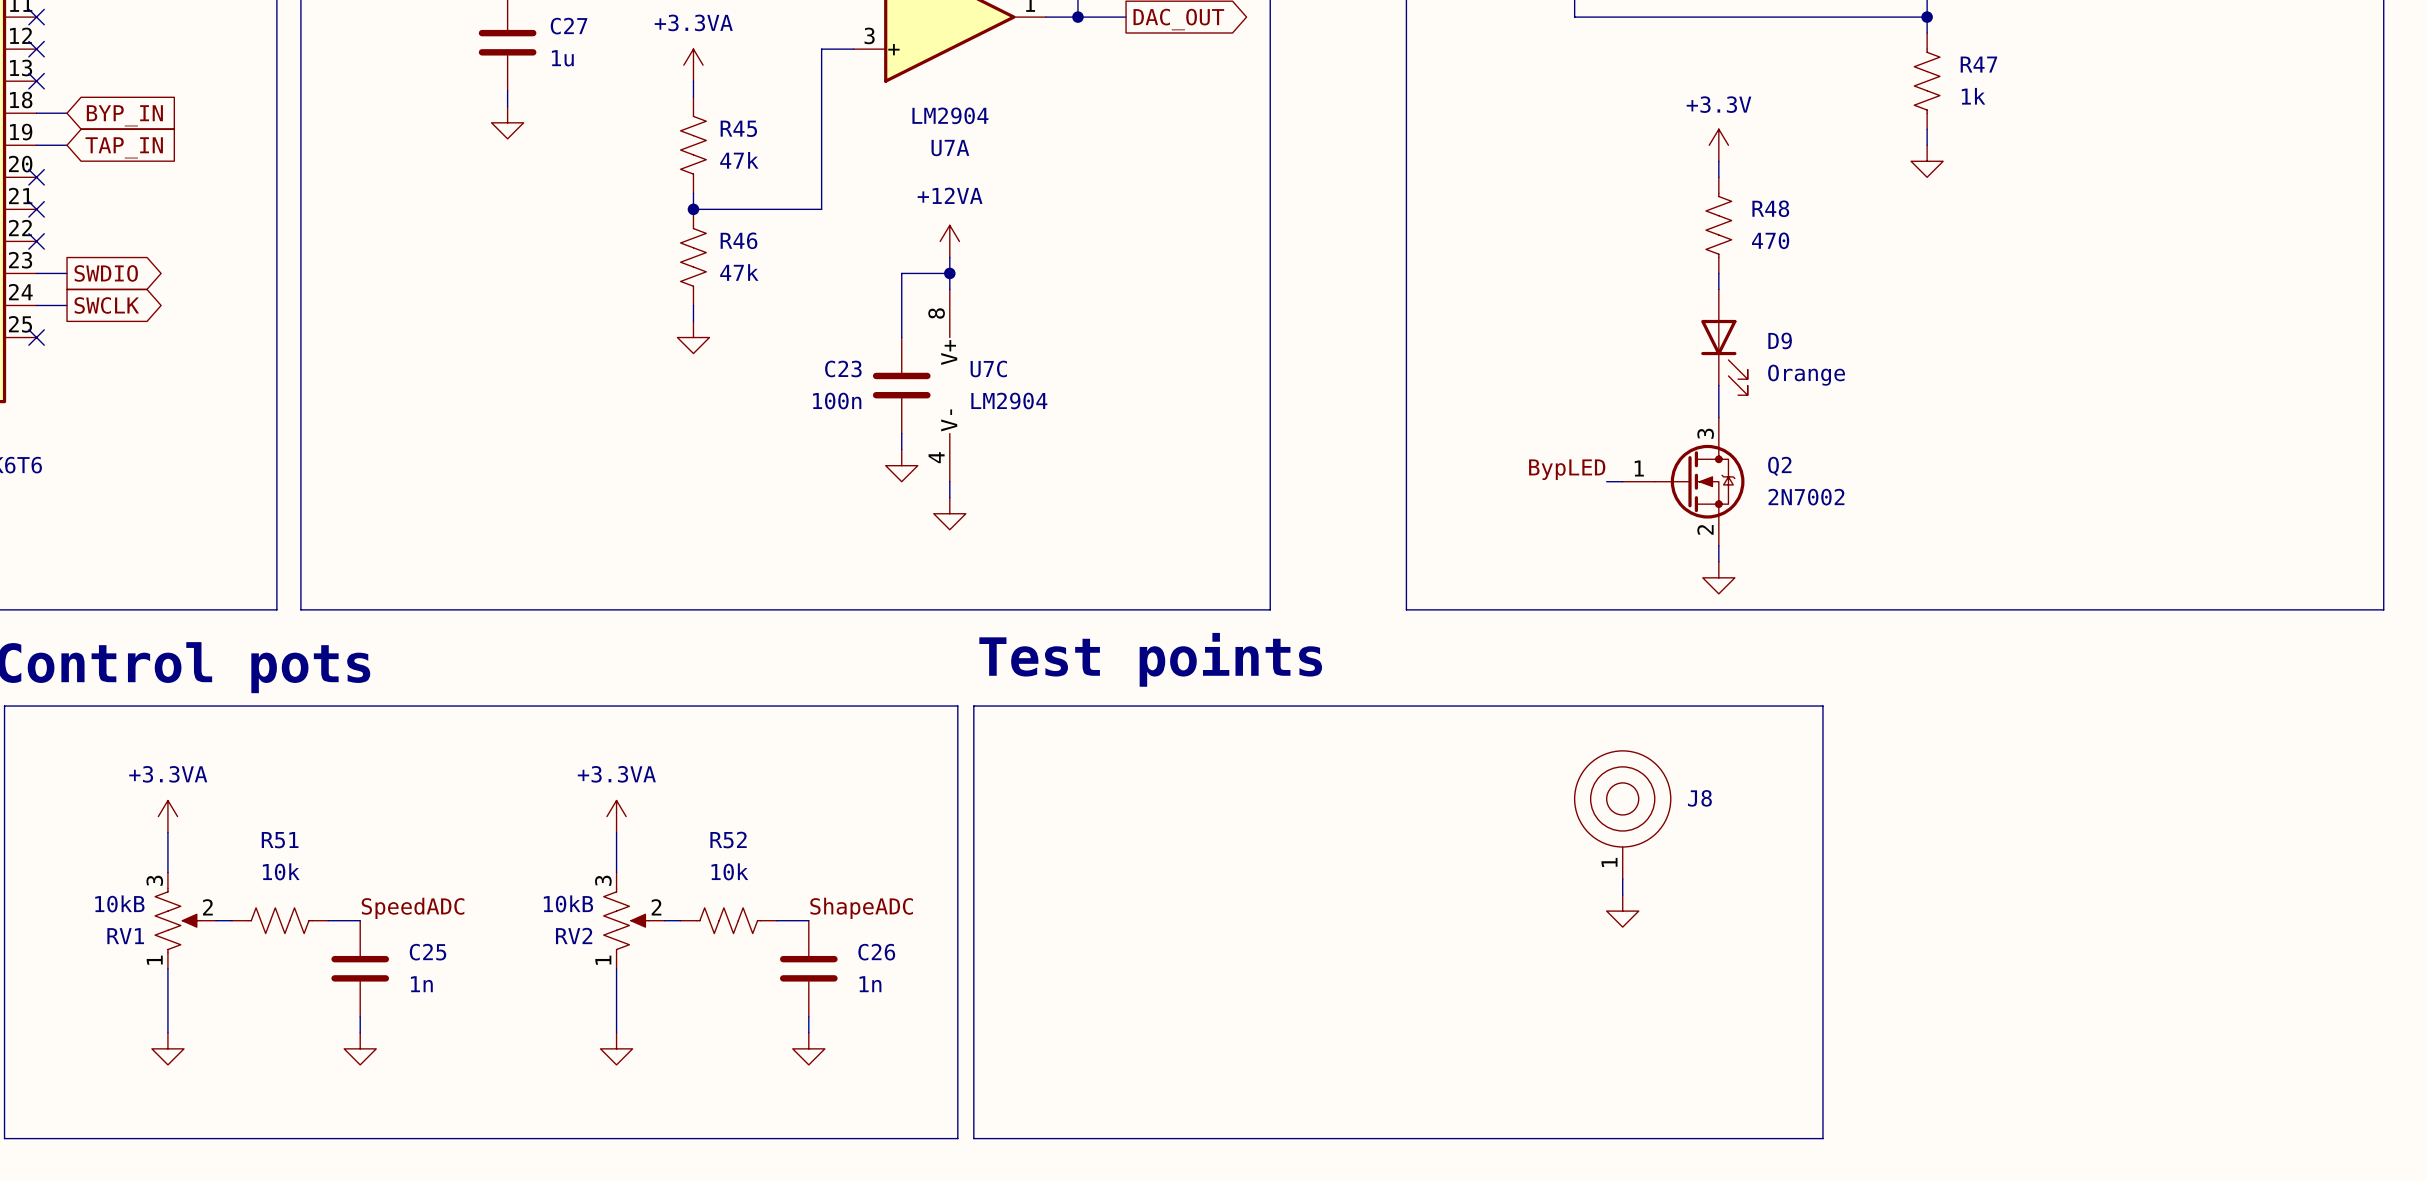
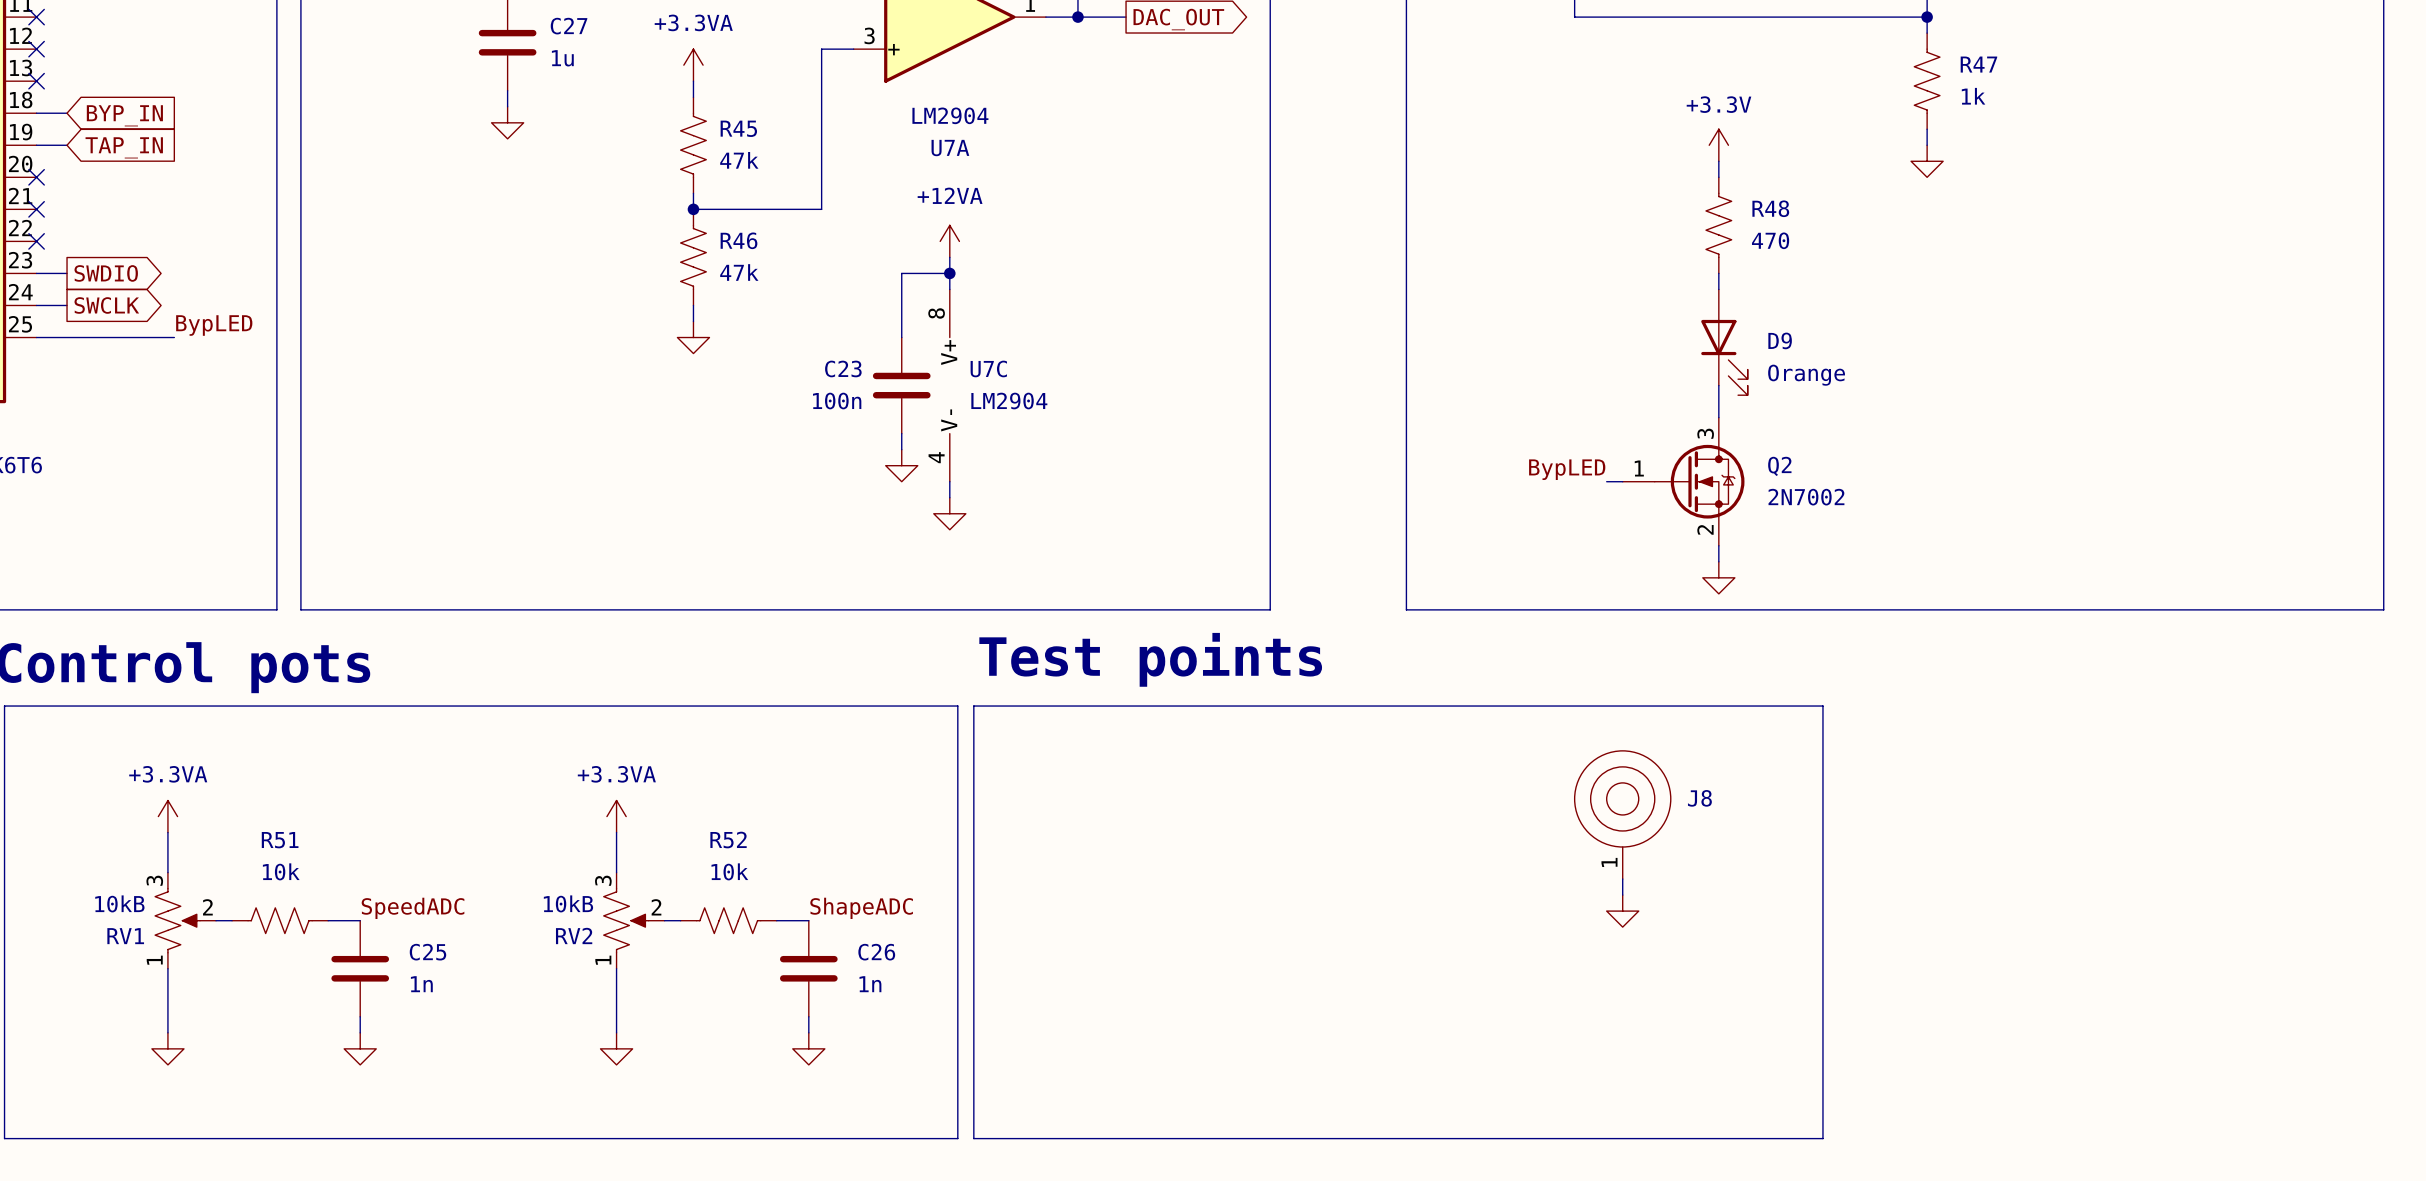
label: none -> BypLED (214, 325)
wire: none -> (36, 337) (174, 337)
no-connect mark: (36, 337) -> none

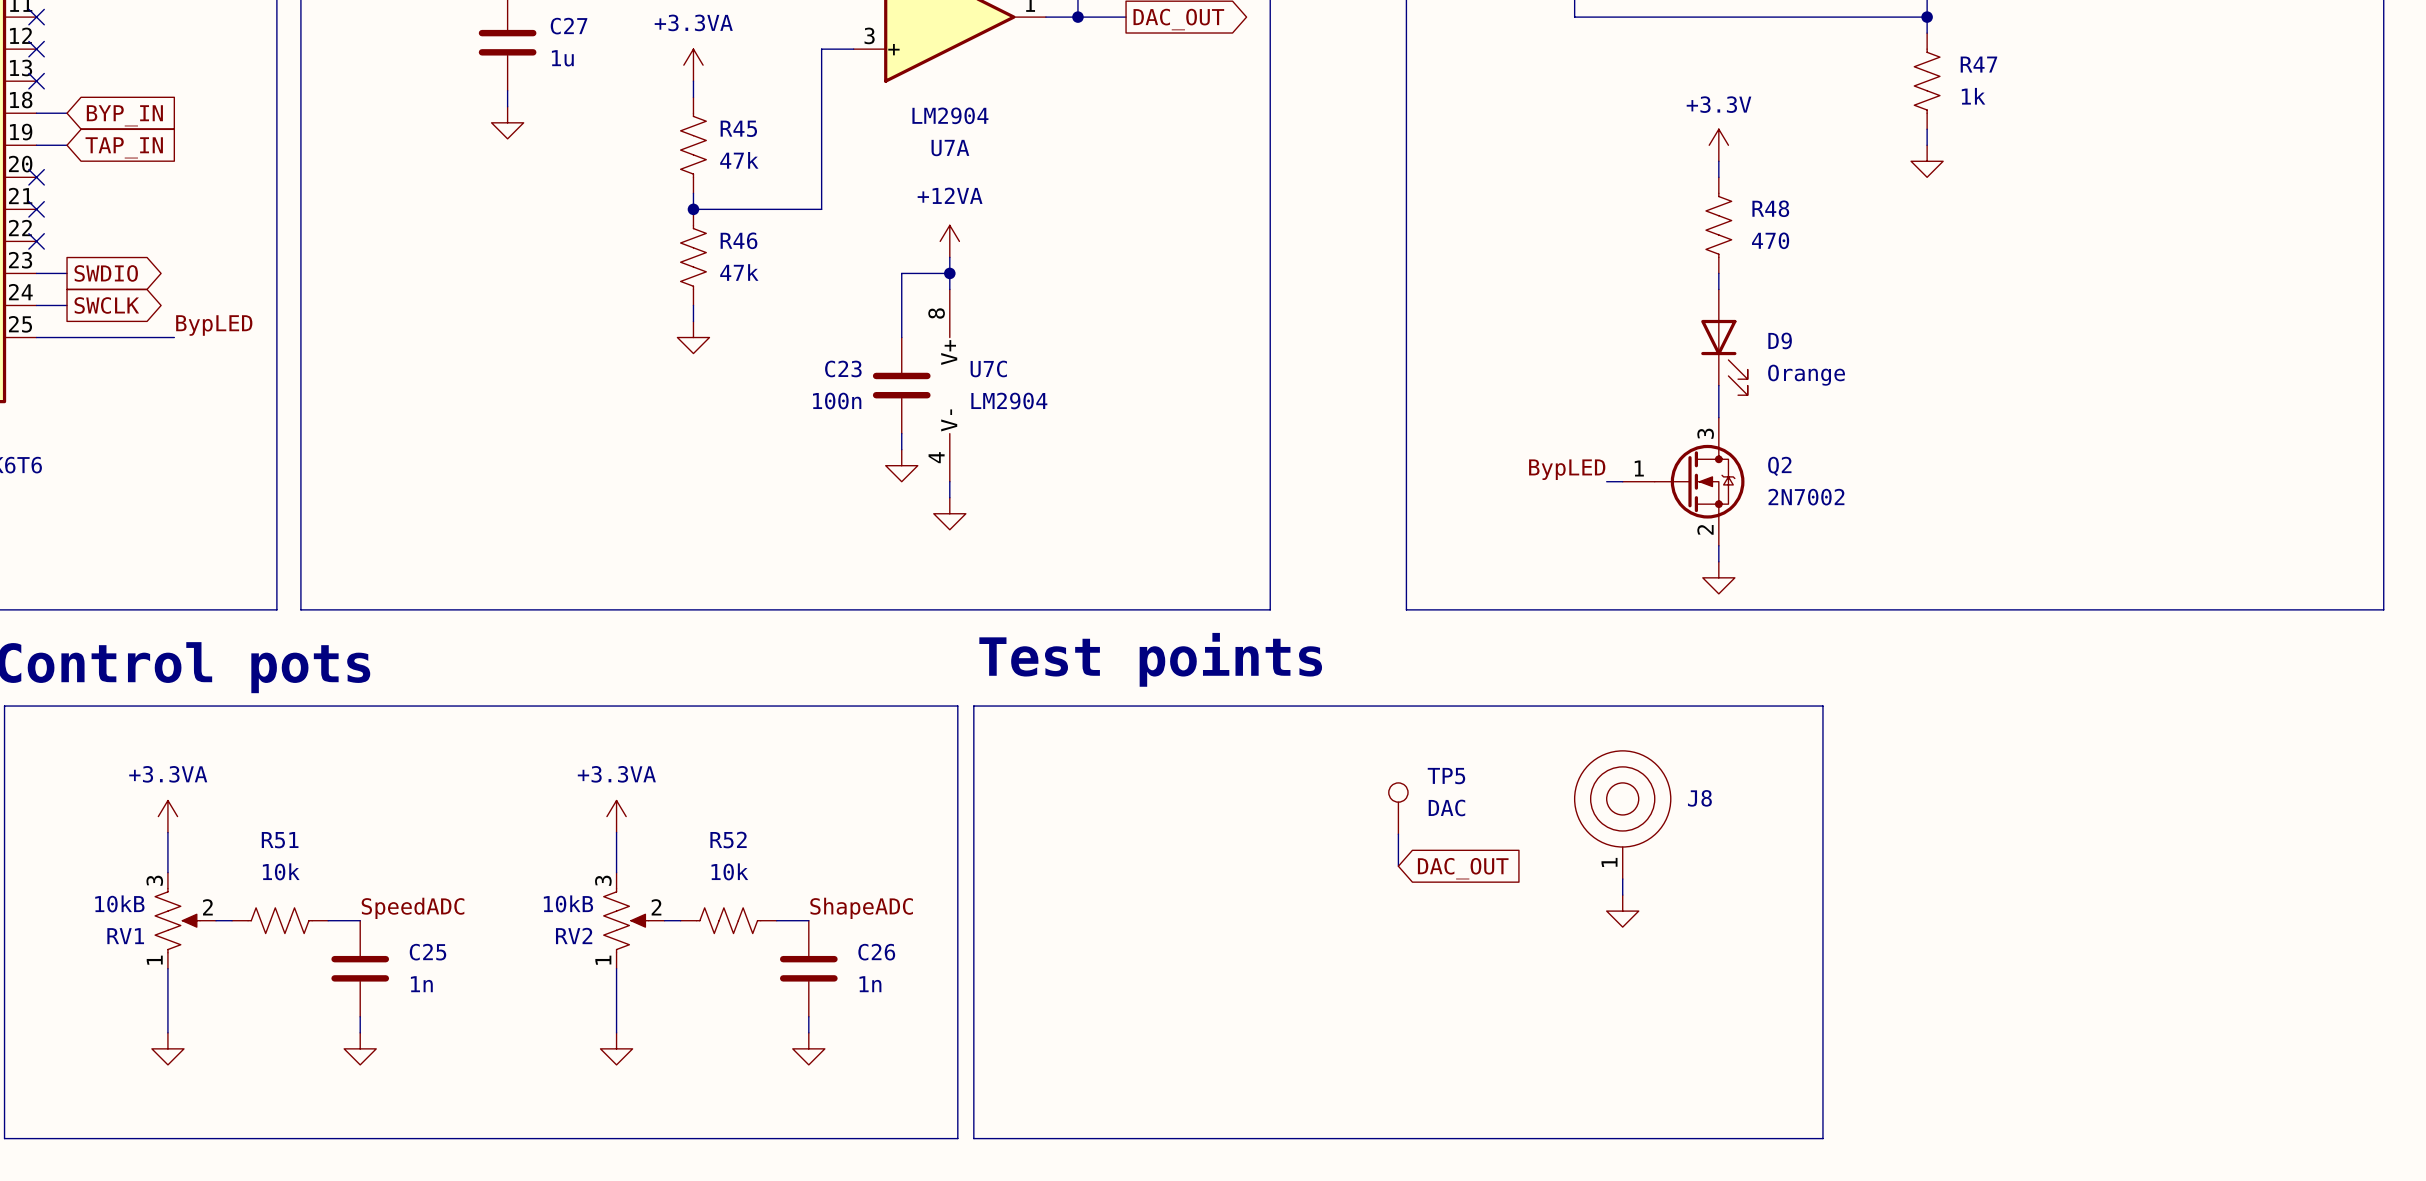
TP5: none -> DAC (1398, 808)
wire: none -> (1398, 834) (1398, 866)
global label: none -> DAC_OUT (1463, 868)

